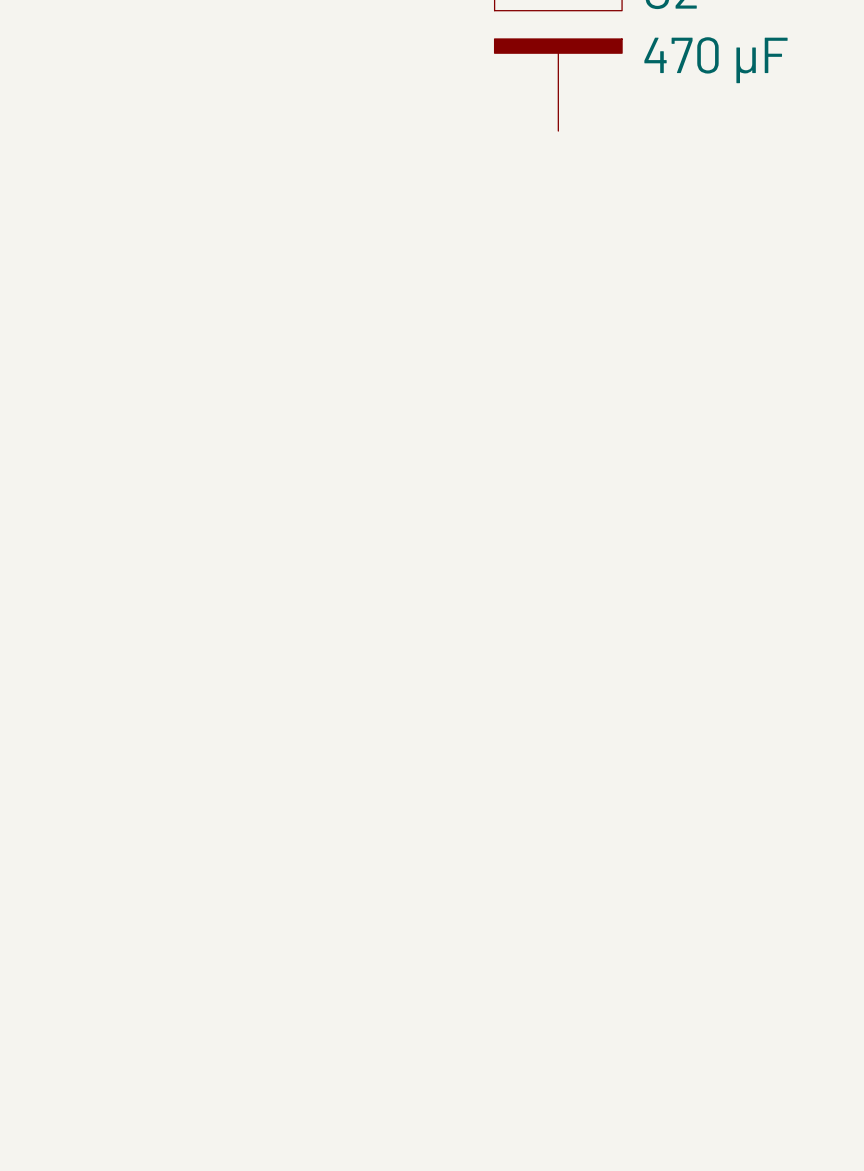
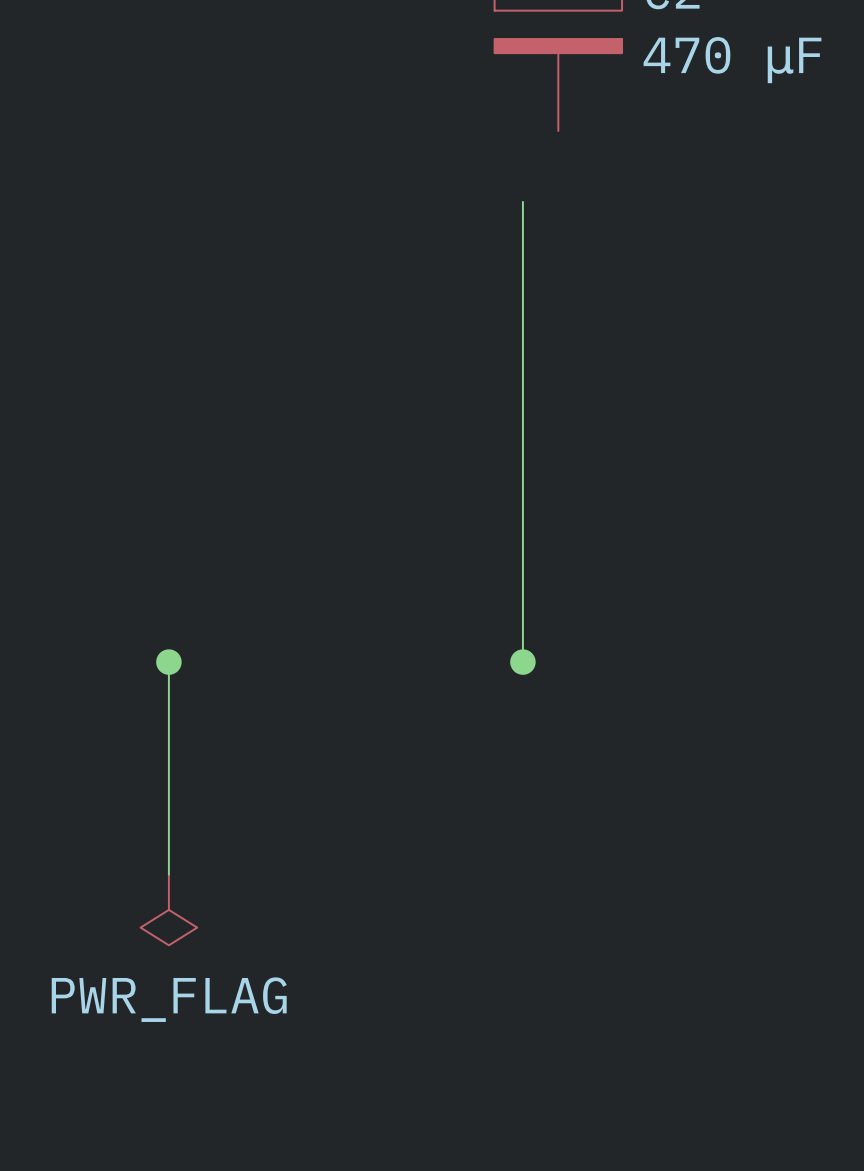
wire: none -> (522, 201) (522, 662)
wire: none -> (168, 662) (168, 874)
junction: none -> (168, 662)
junction: none -> (522, 662)
power symbol: none -> PWR_FLAG (168, 909)

